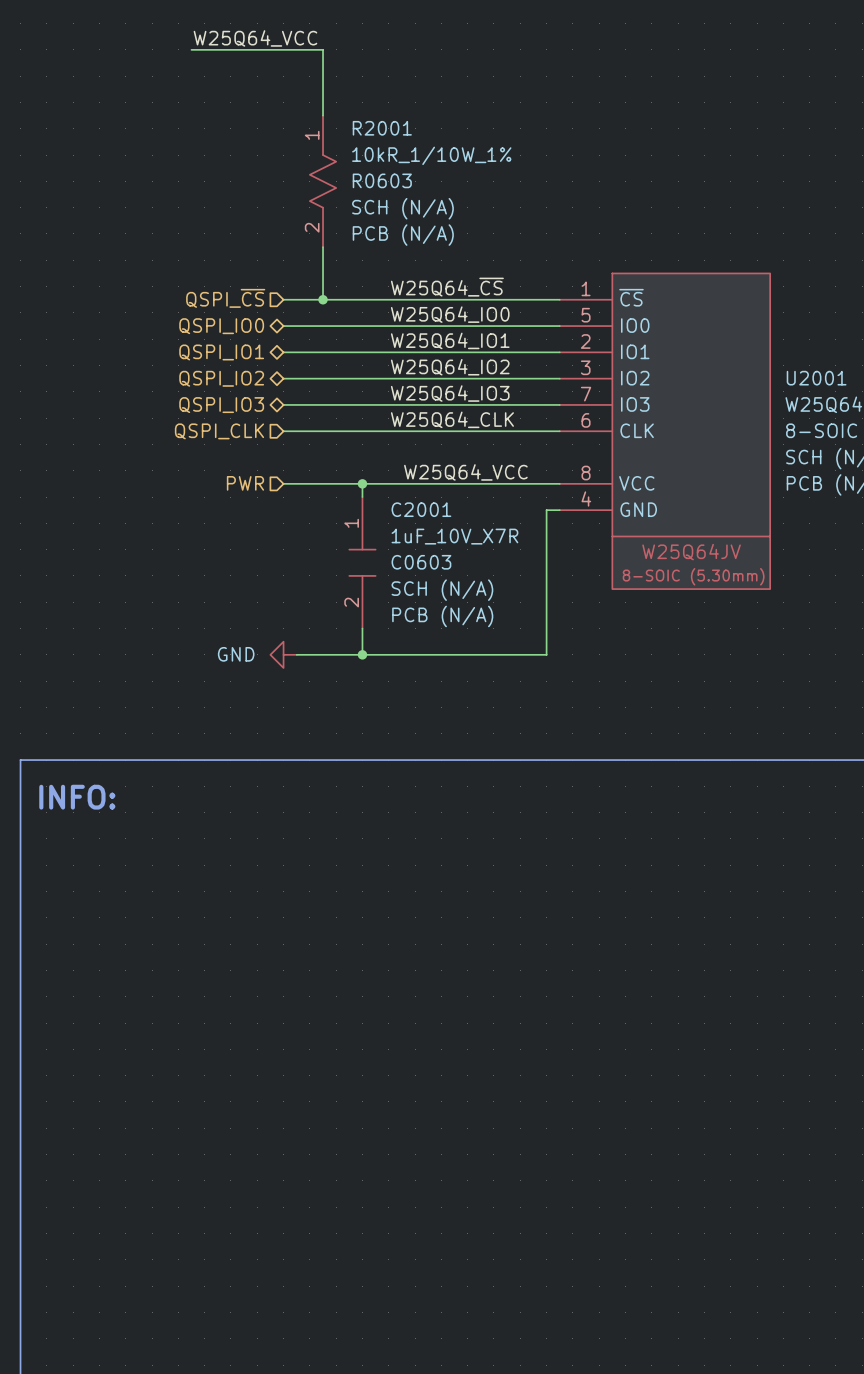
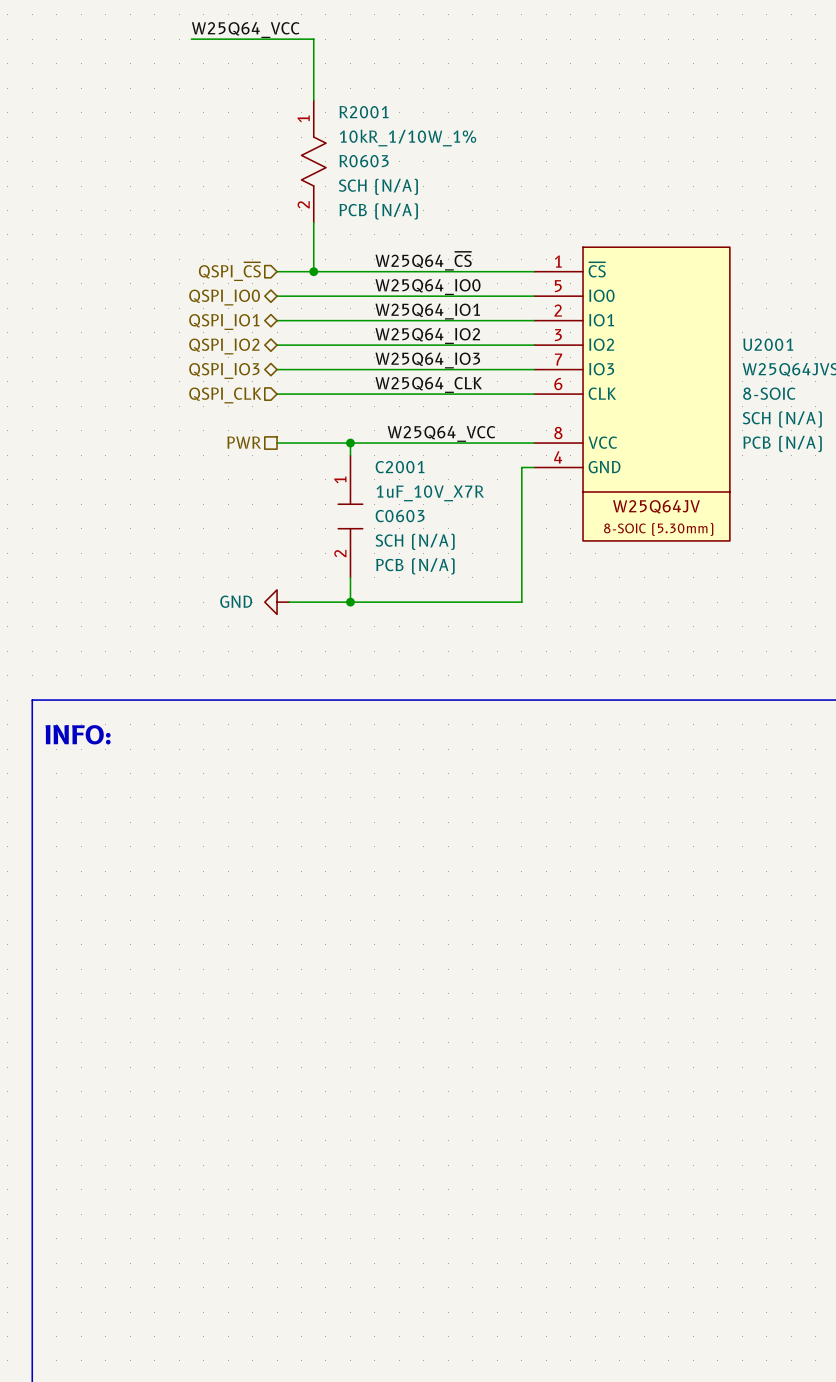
hierarchical label shape: input (245, 483) -> passive (244, 442)

